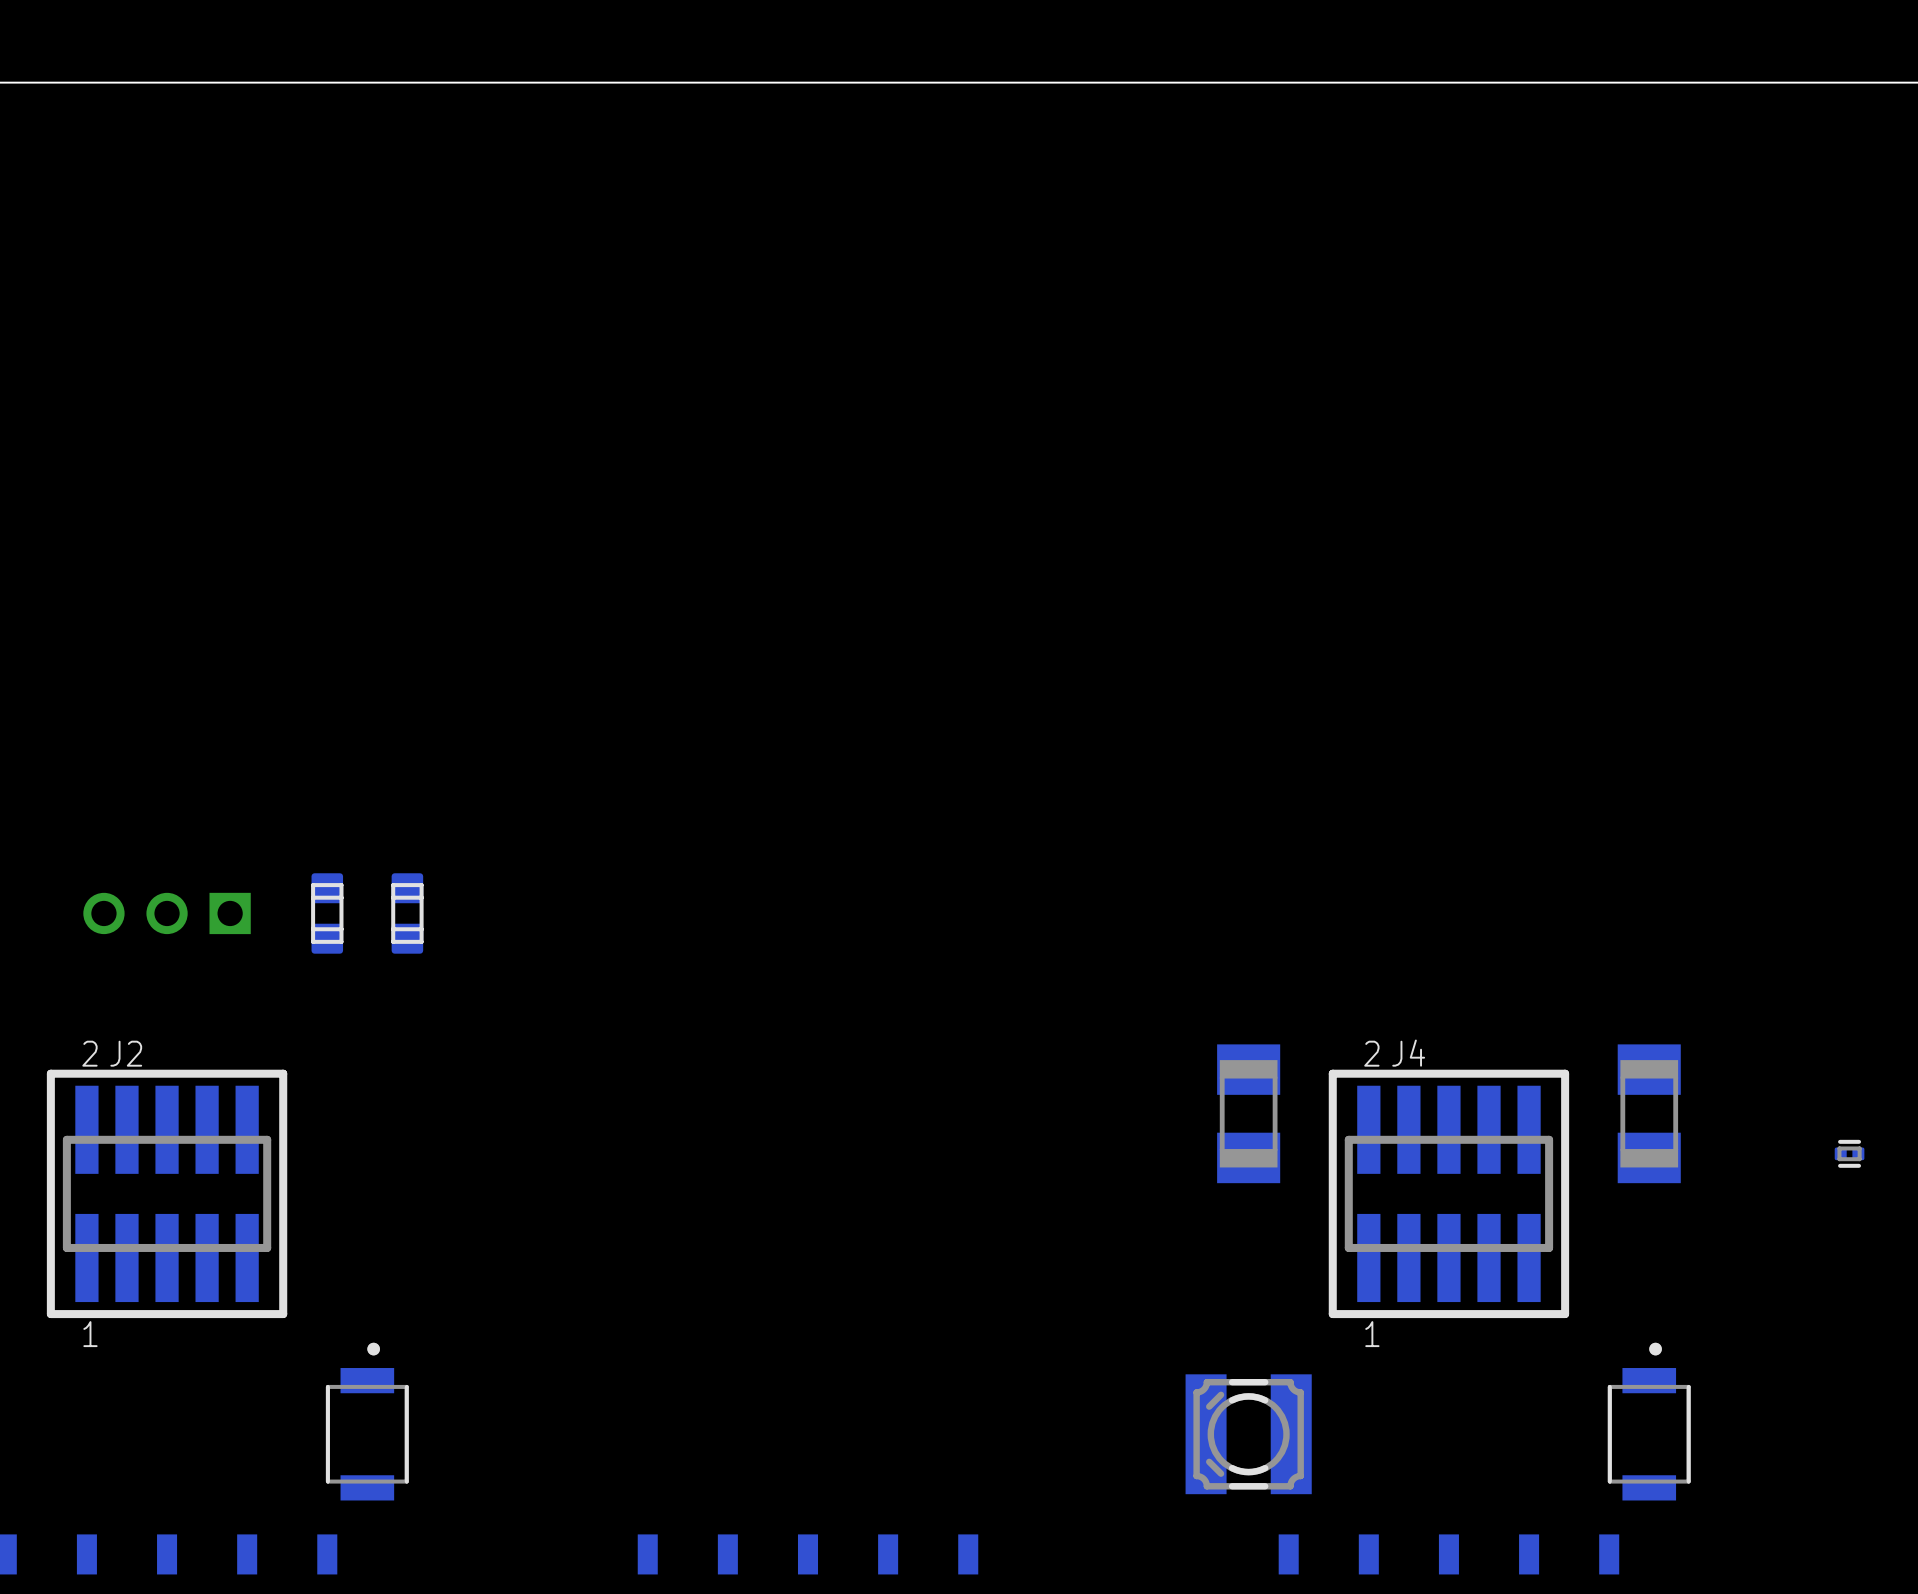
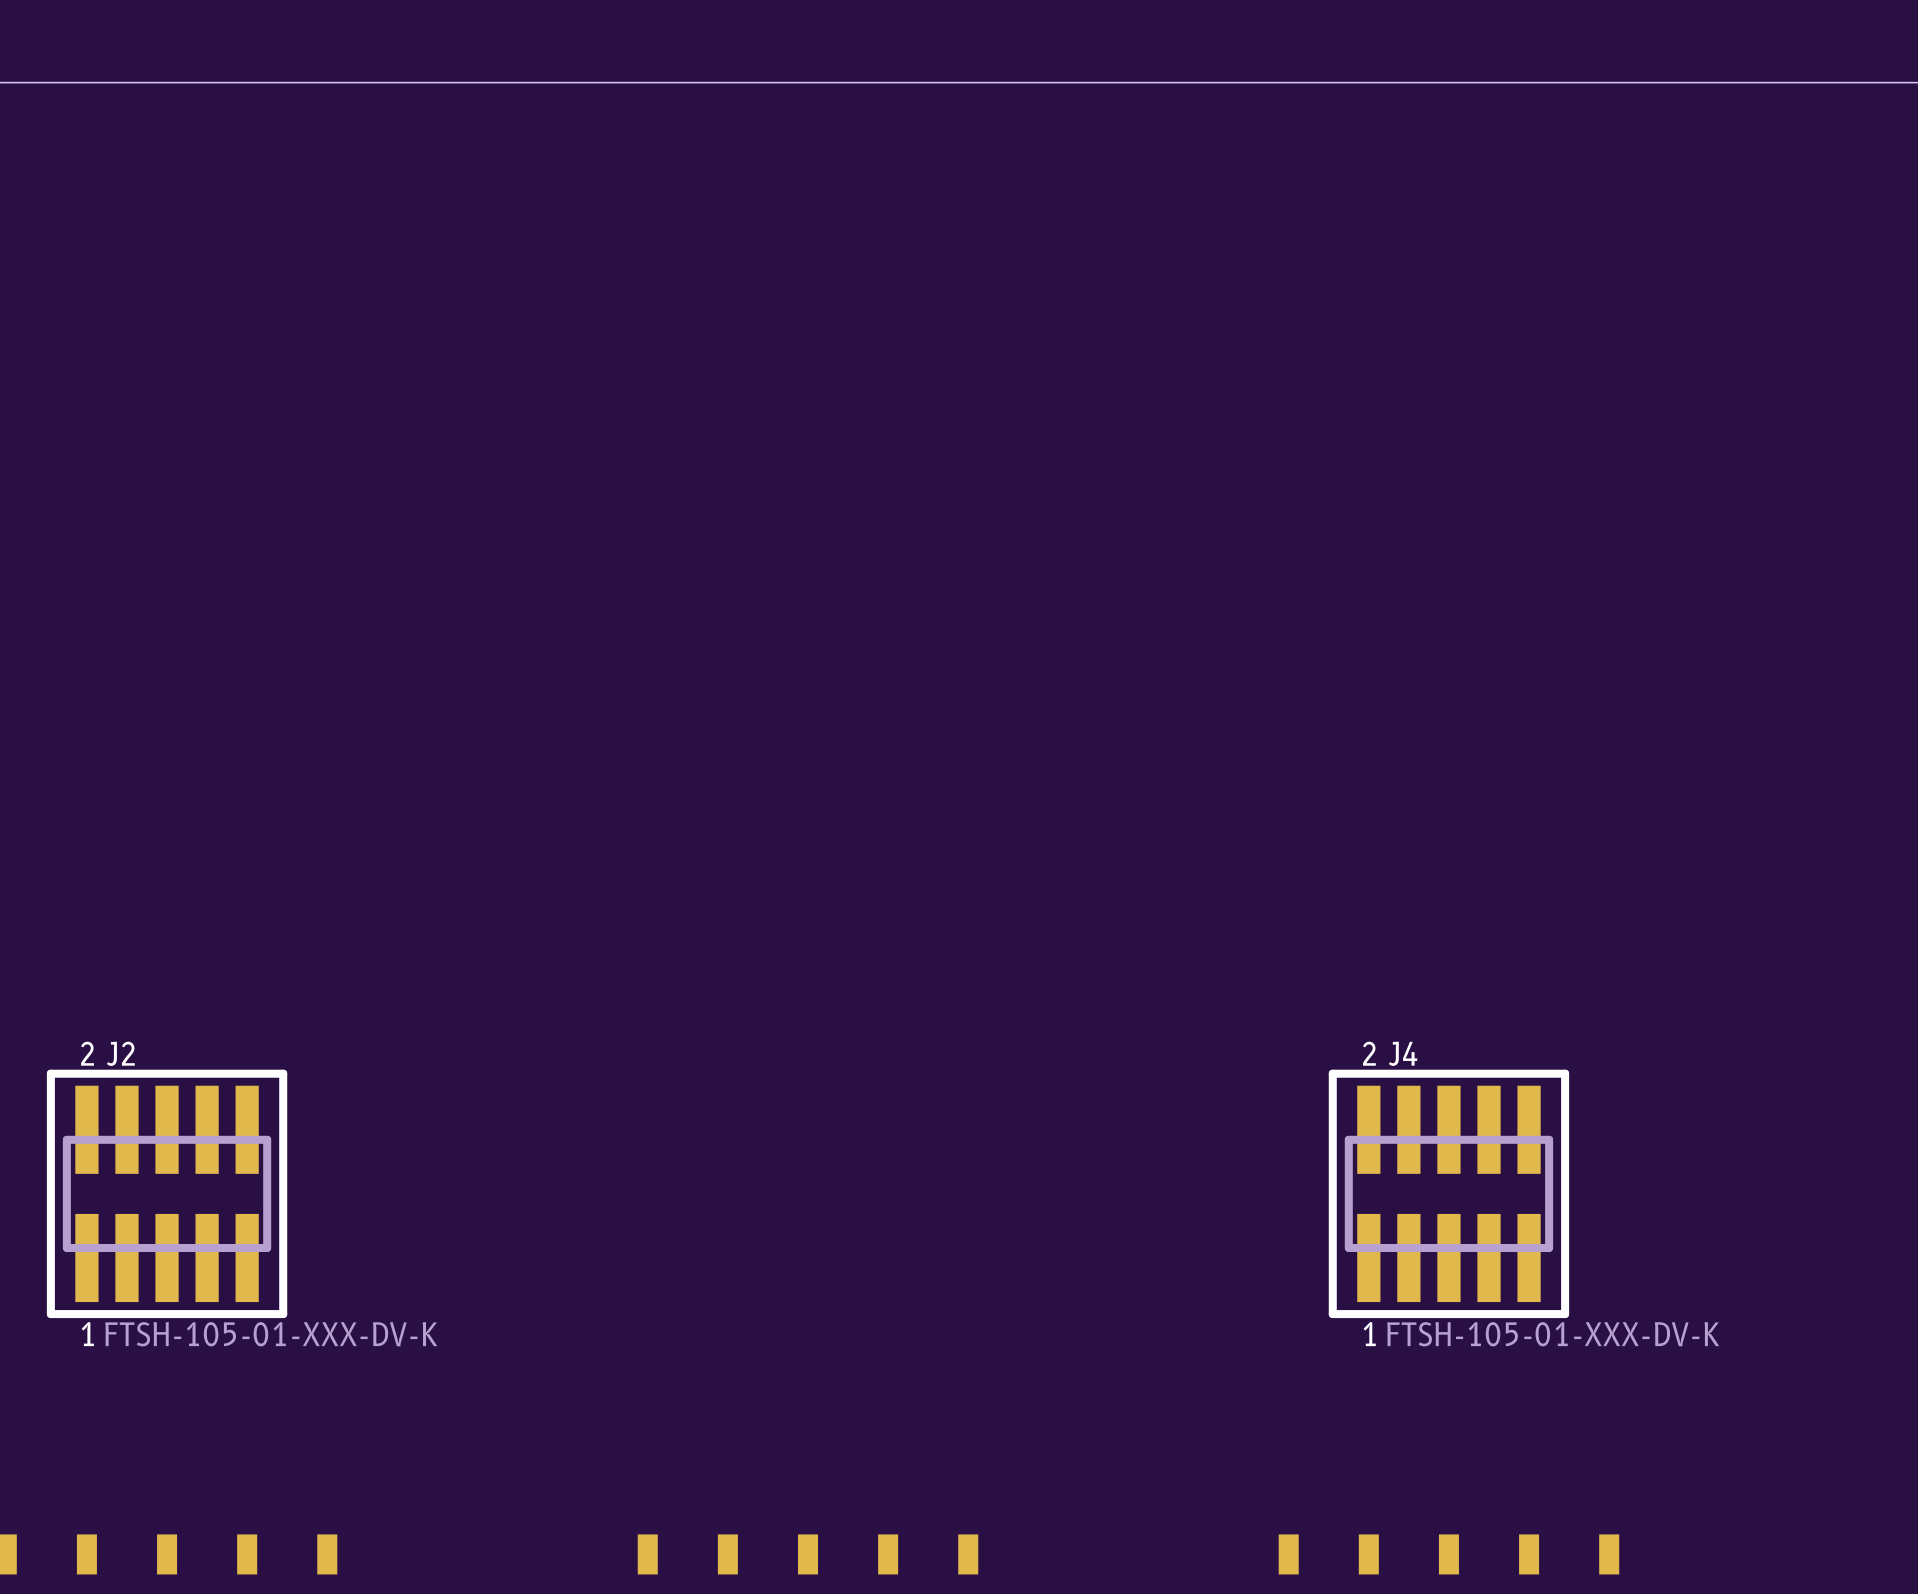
part: (167, 913) -> none
part: (327, 913) -> none
part: (407, 913) -> none
part: (1248, 1113) -> none
part: (1649, 1113) -> none
part: (1849, 1153) -> none
J2 value: none -> FTSH-105-01-XXX-DV-K (271, 1334)
J4 value: none -> FTSH-105-01-XXX-DV-K (1553, 1334)
part: (367, 1421) -> none
part: (1649, 1421) -> none
part: (1248, 1434) -> none

